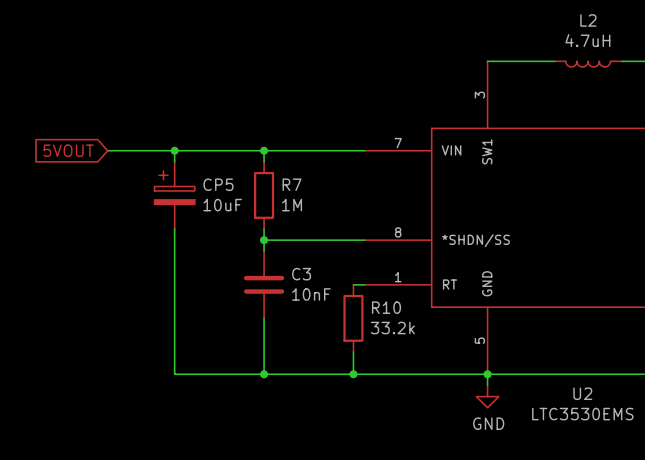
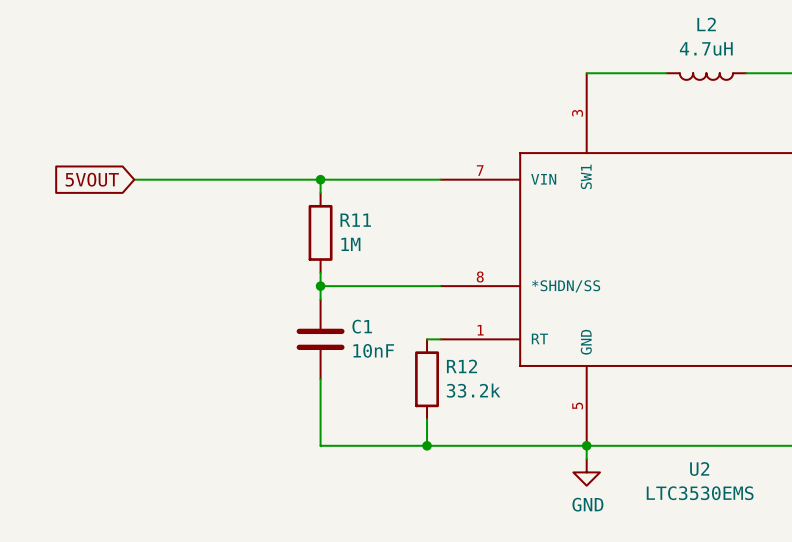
wire: (174, 150) (174, 161) -> none
junction: (174, 150) -> none
R7 name: R7 (292, 184) -> R11 (355, 220)
CP5: 10uF (174, 195) -> none
wire: (174, 228) (174, 374) (264, 374) -> none
C3 name: C3 (301, 274) -> C1 (362, 326)
R10 name: R10 (386, 307) -> R12 (462, 366)
junction: (264, 374) -> none

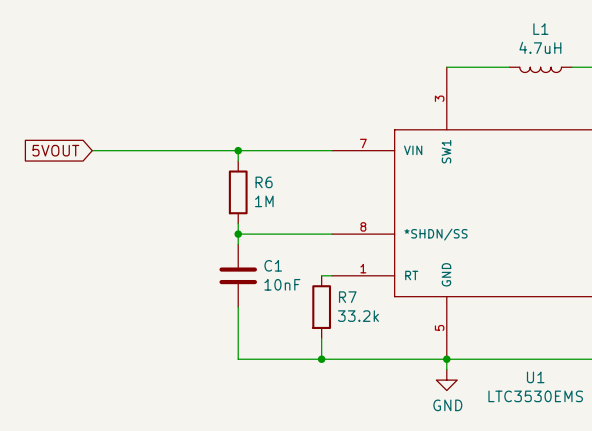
L2 name: L2 (706, 24) -> L1 (540, 29)
R11 name: R11 (355, 220) -> R6 (264, 182)
R12 name: R12 (462, 366) -> R7 (347, 297)
U2 name: U2 (699, 469) -> U1 (535, 377)

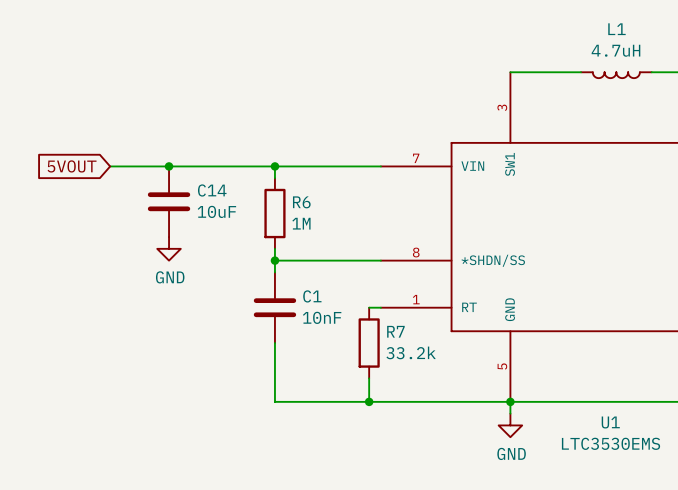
junction: none -> (169, 166)
C14: none -> 10uF (169, 201)
power symbol: none -> GND (169, 248)

